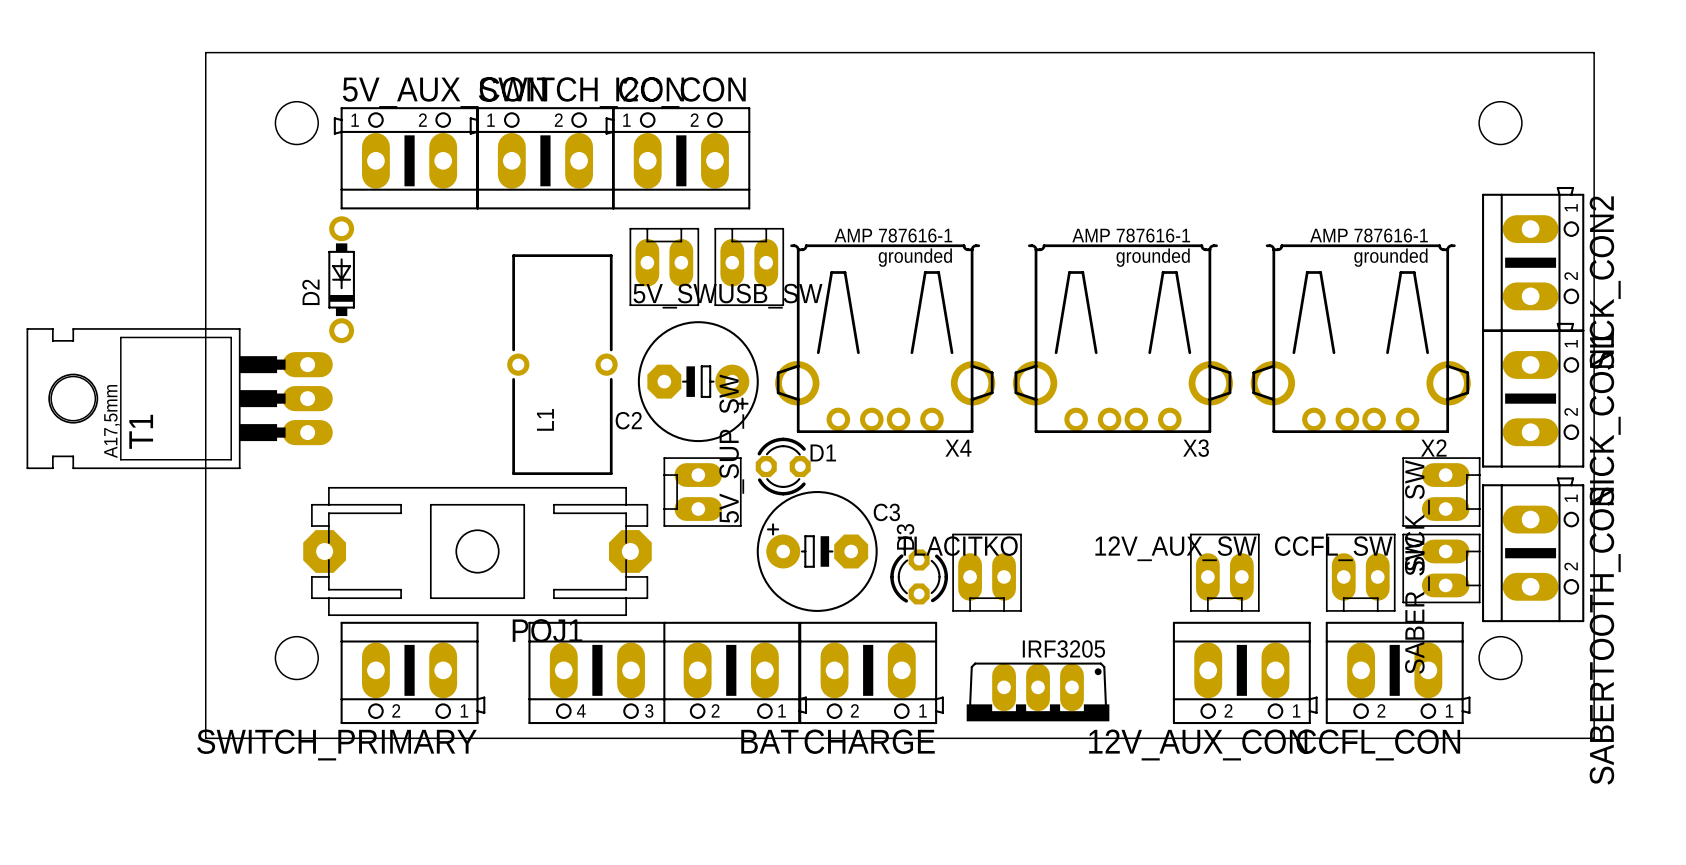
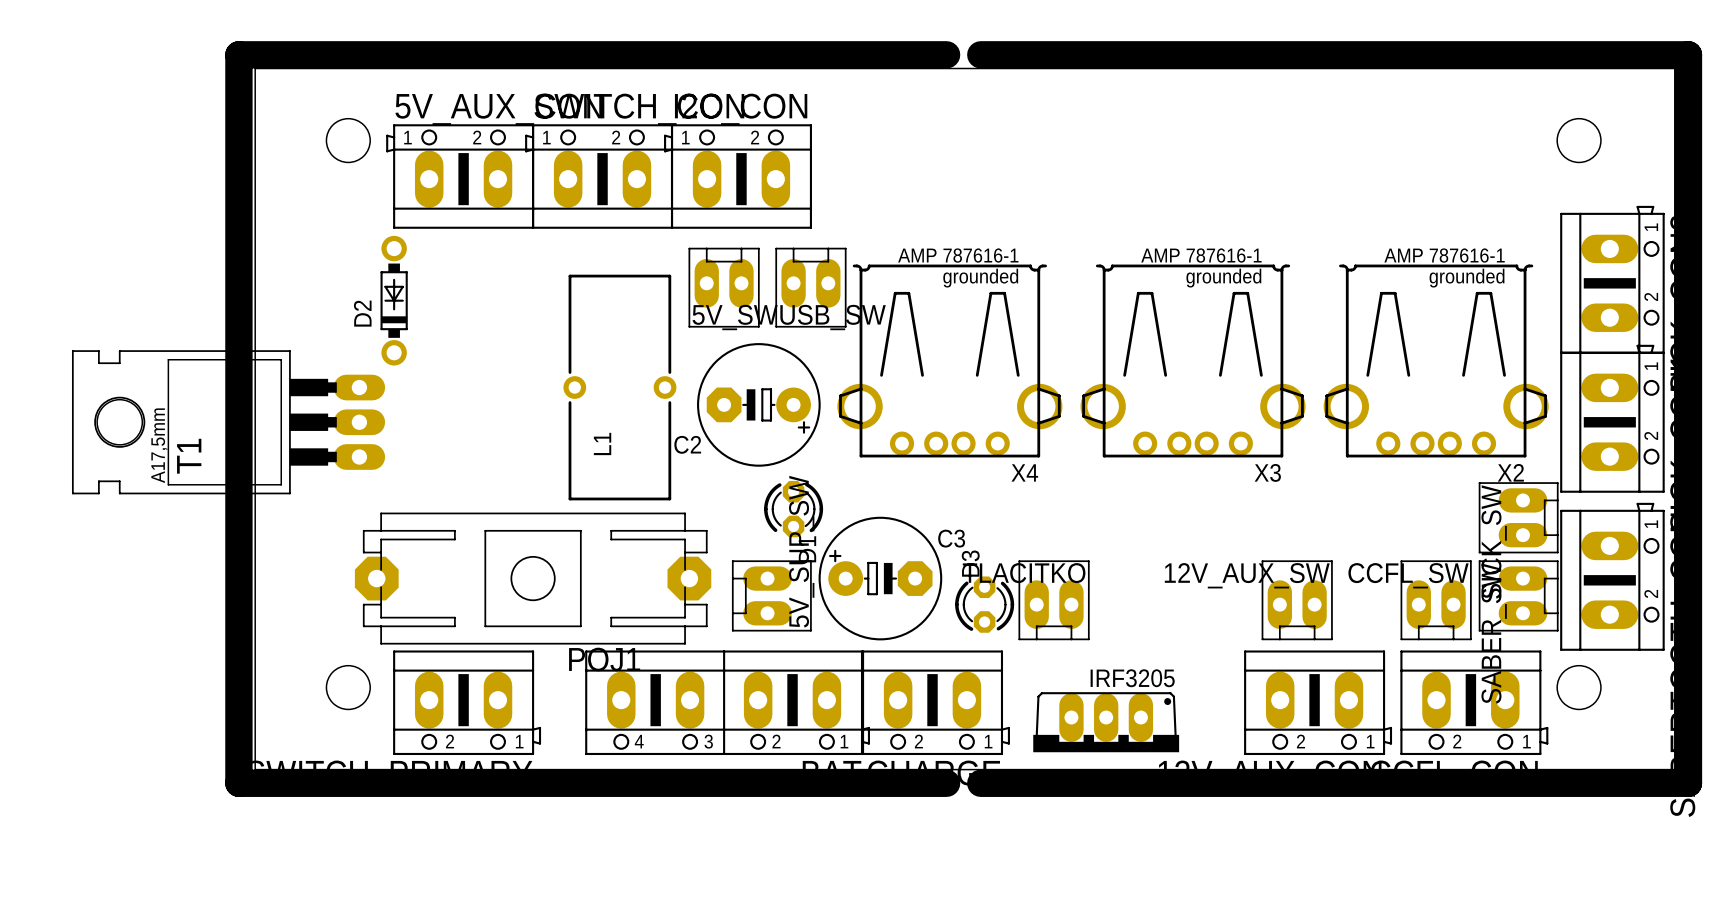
board edge: none -> (946, 54) (238, 54) (238, 783) (946, 783)
board edge: none -> (980, 54) (1688, 54) (1688, 783) (980, 783)
D1 rotation: 0° (783, 466) -> 90° clockwise (793, 509)
D1 position: (783, 466) -> (793, 509)
5V_SUP_SW position: (702, 492) -> (771, 595)

